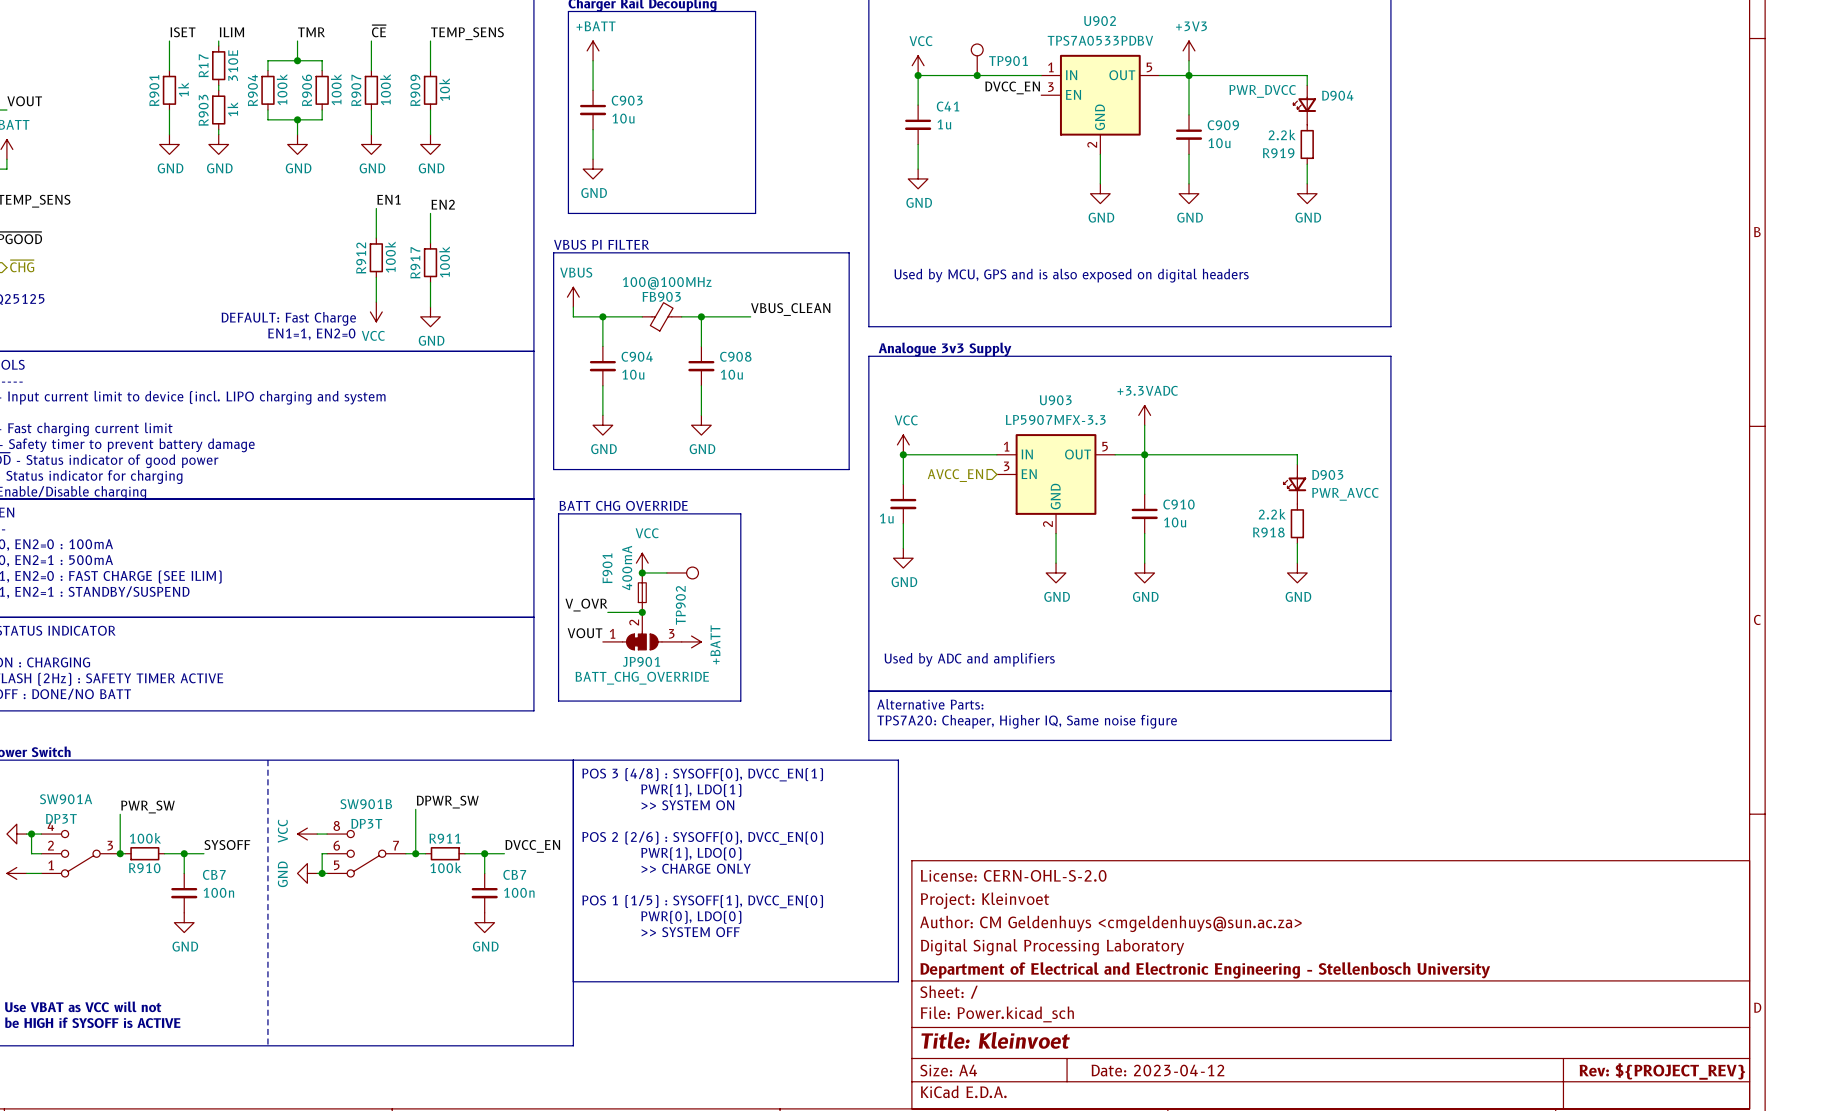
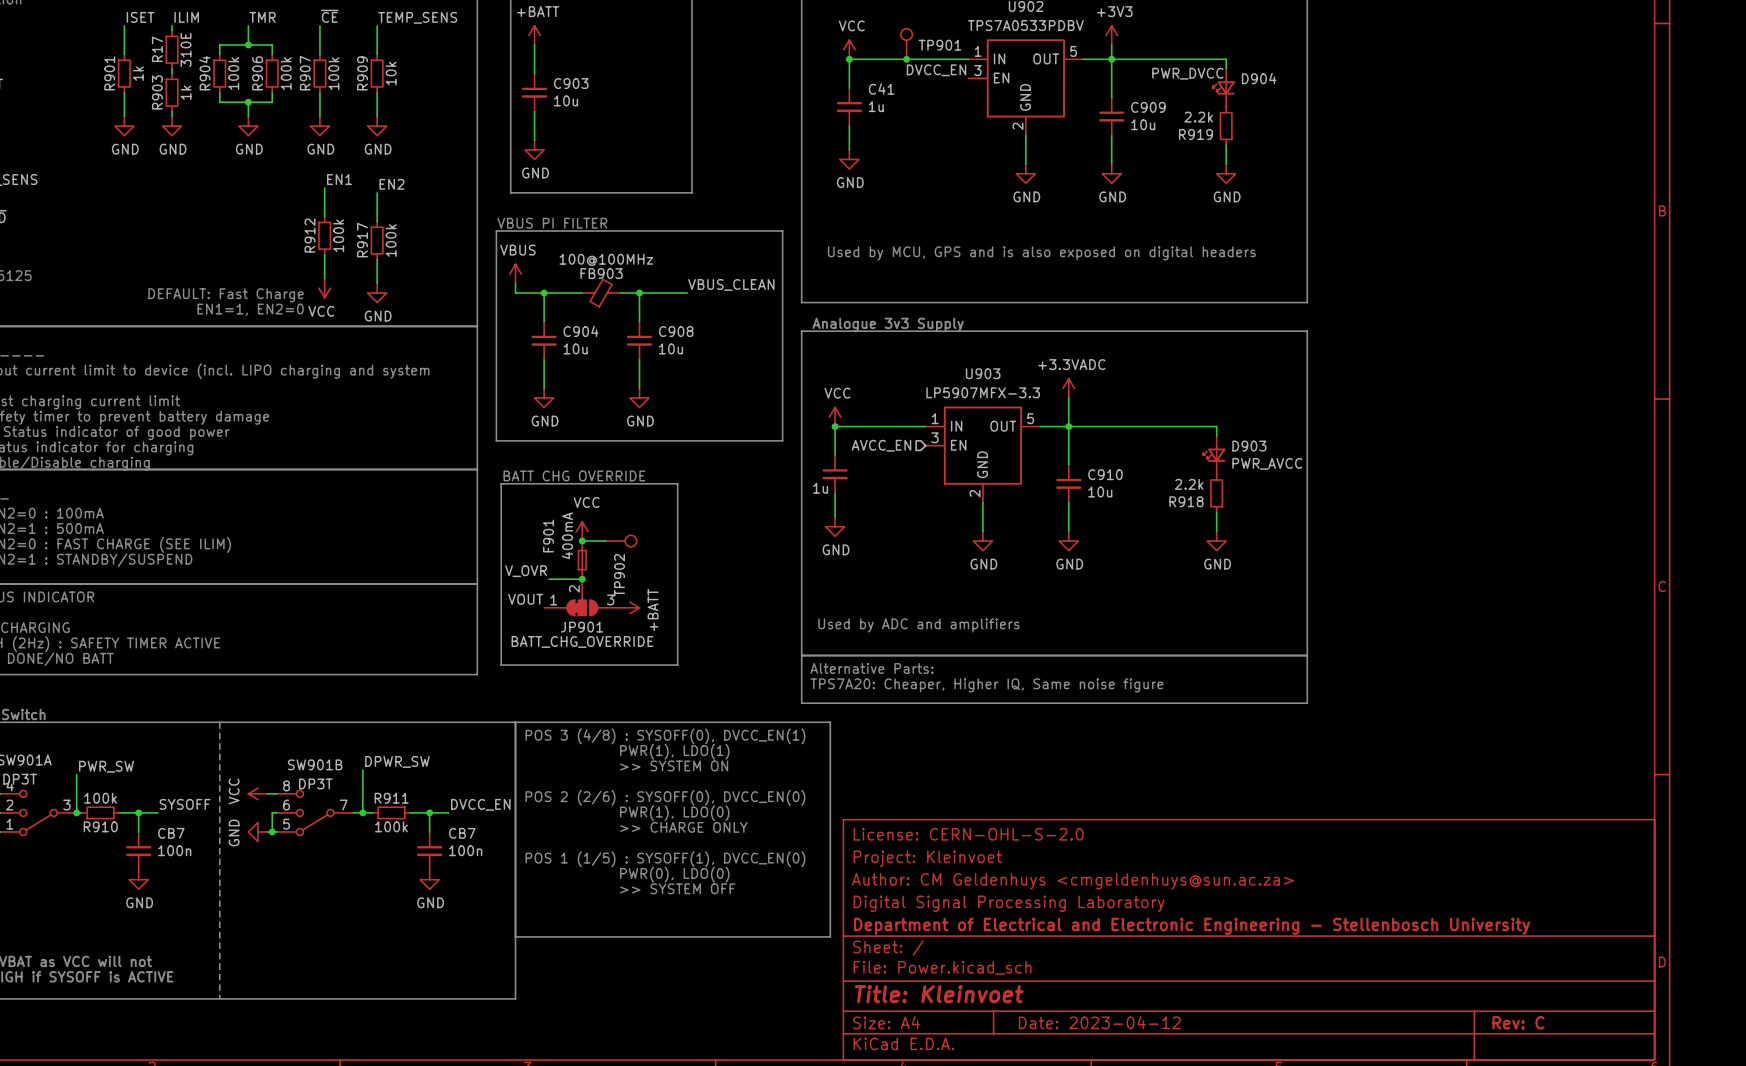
title block: Rev: ${PROJECT_REV} (1662, 1071) -> Rev: C (1518, 1022)

